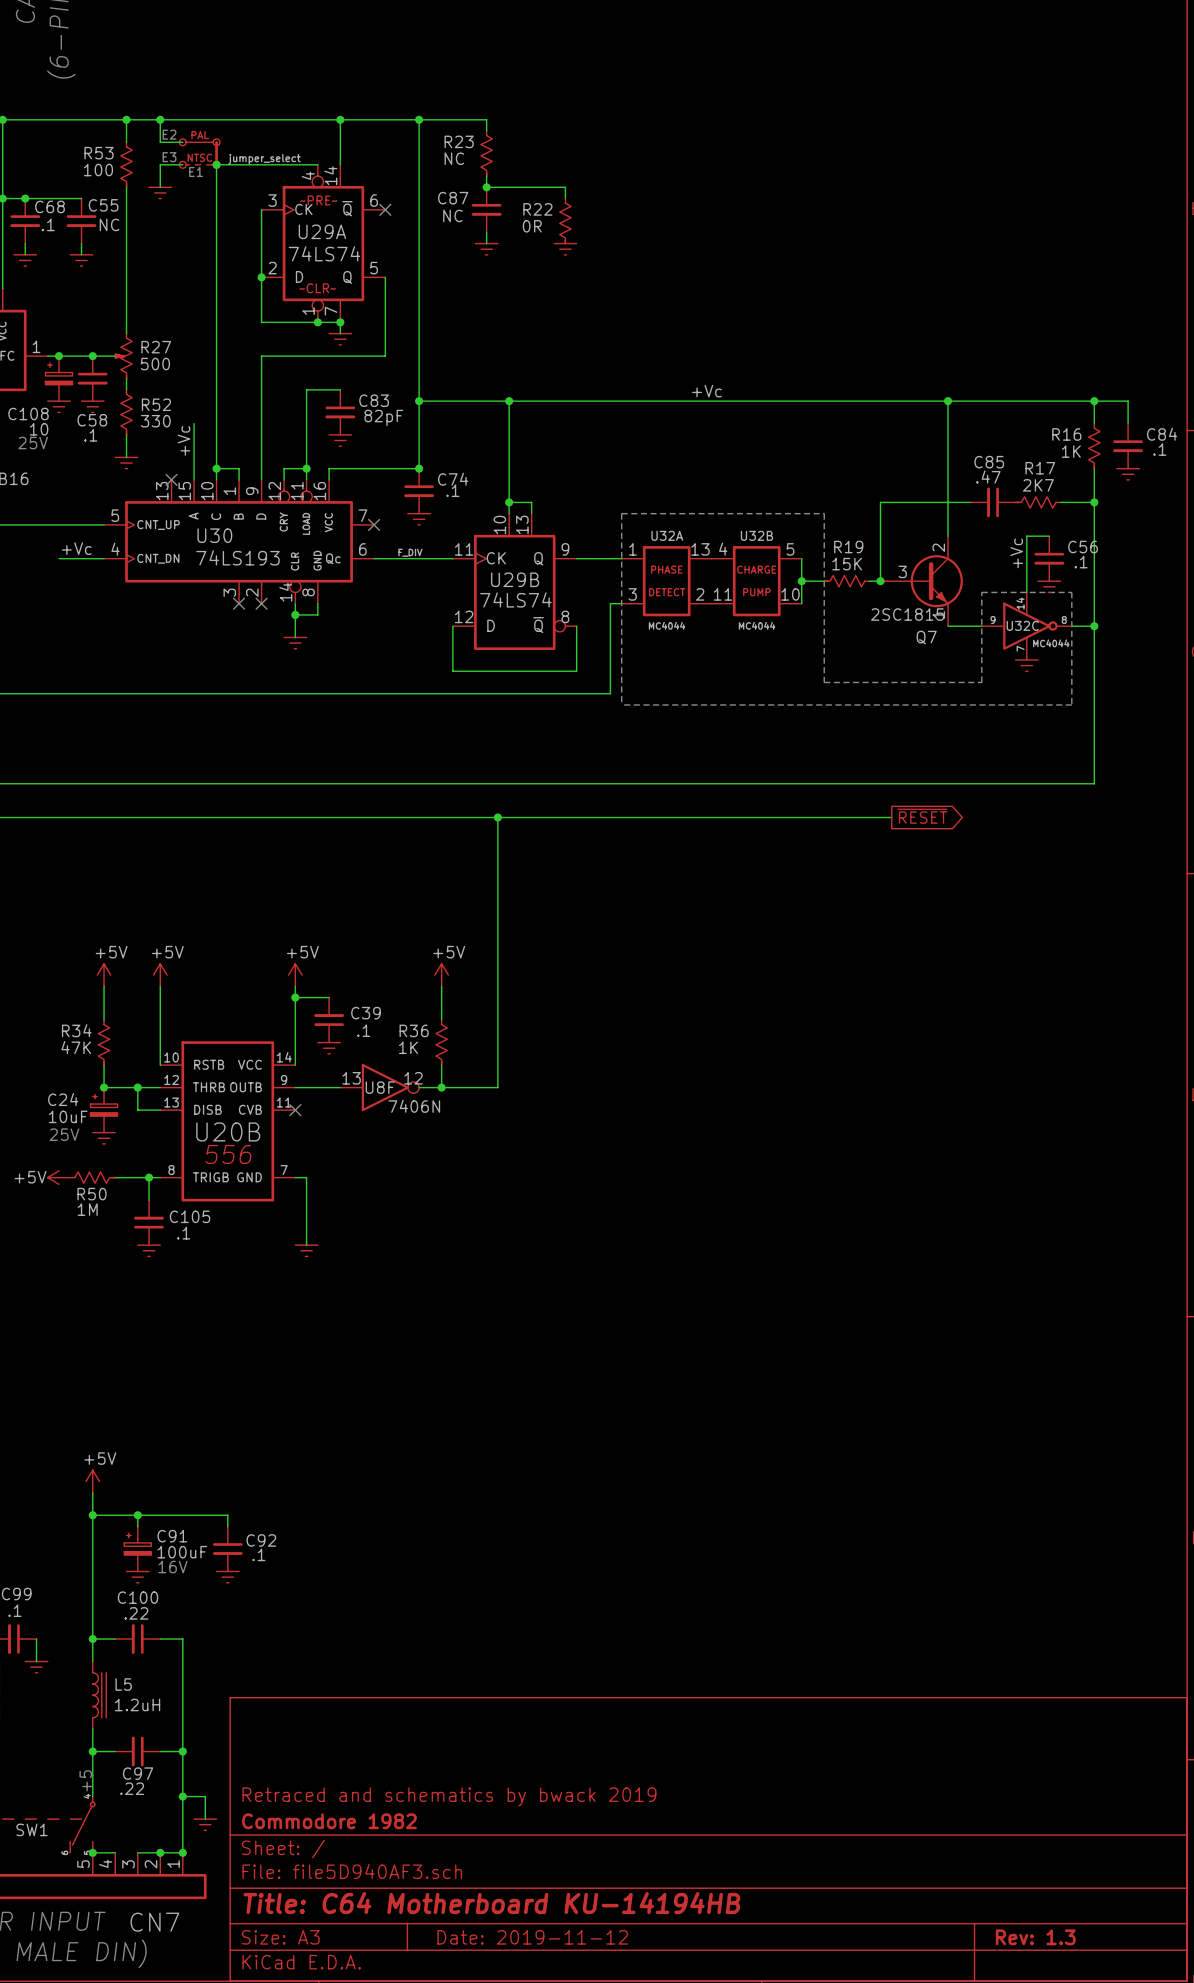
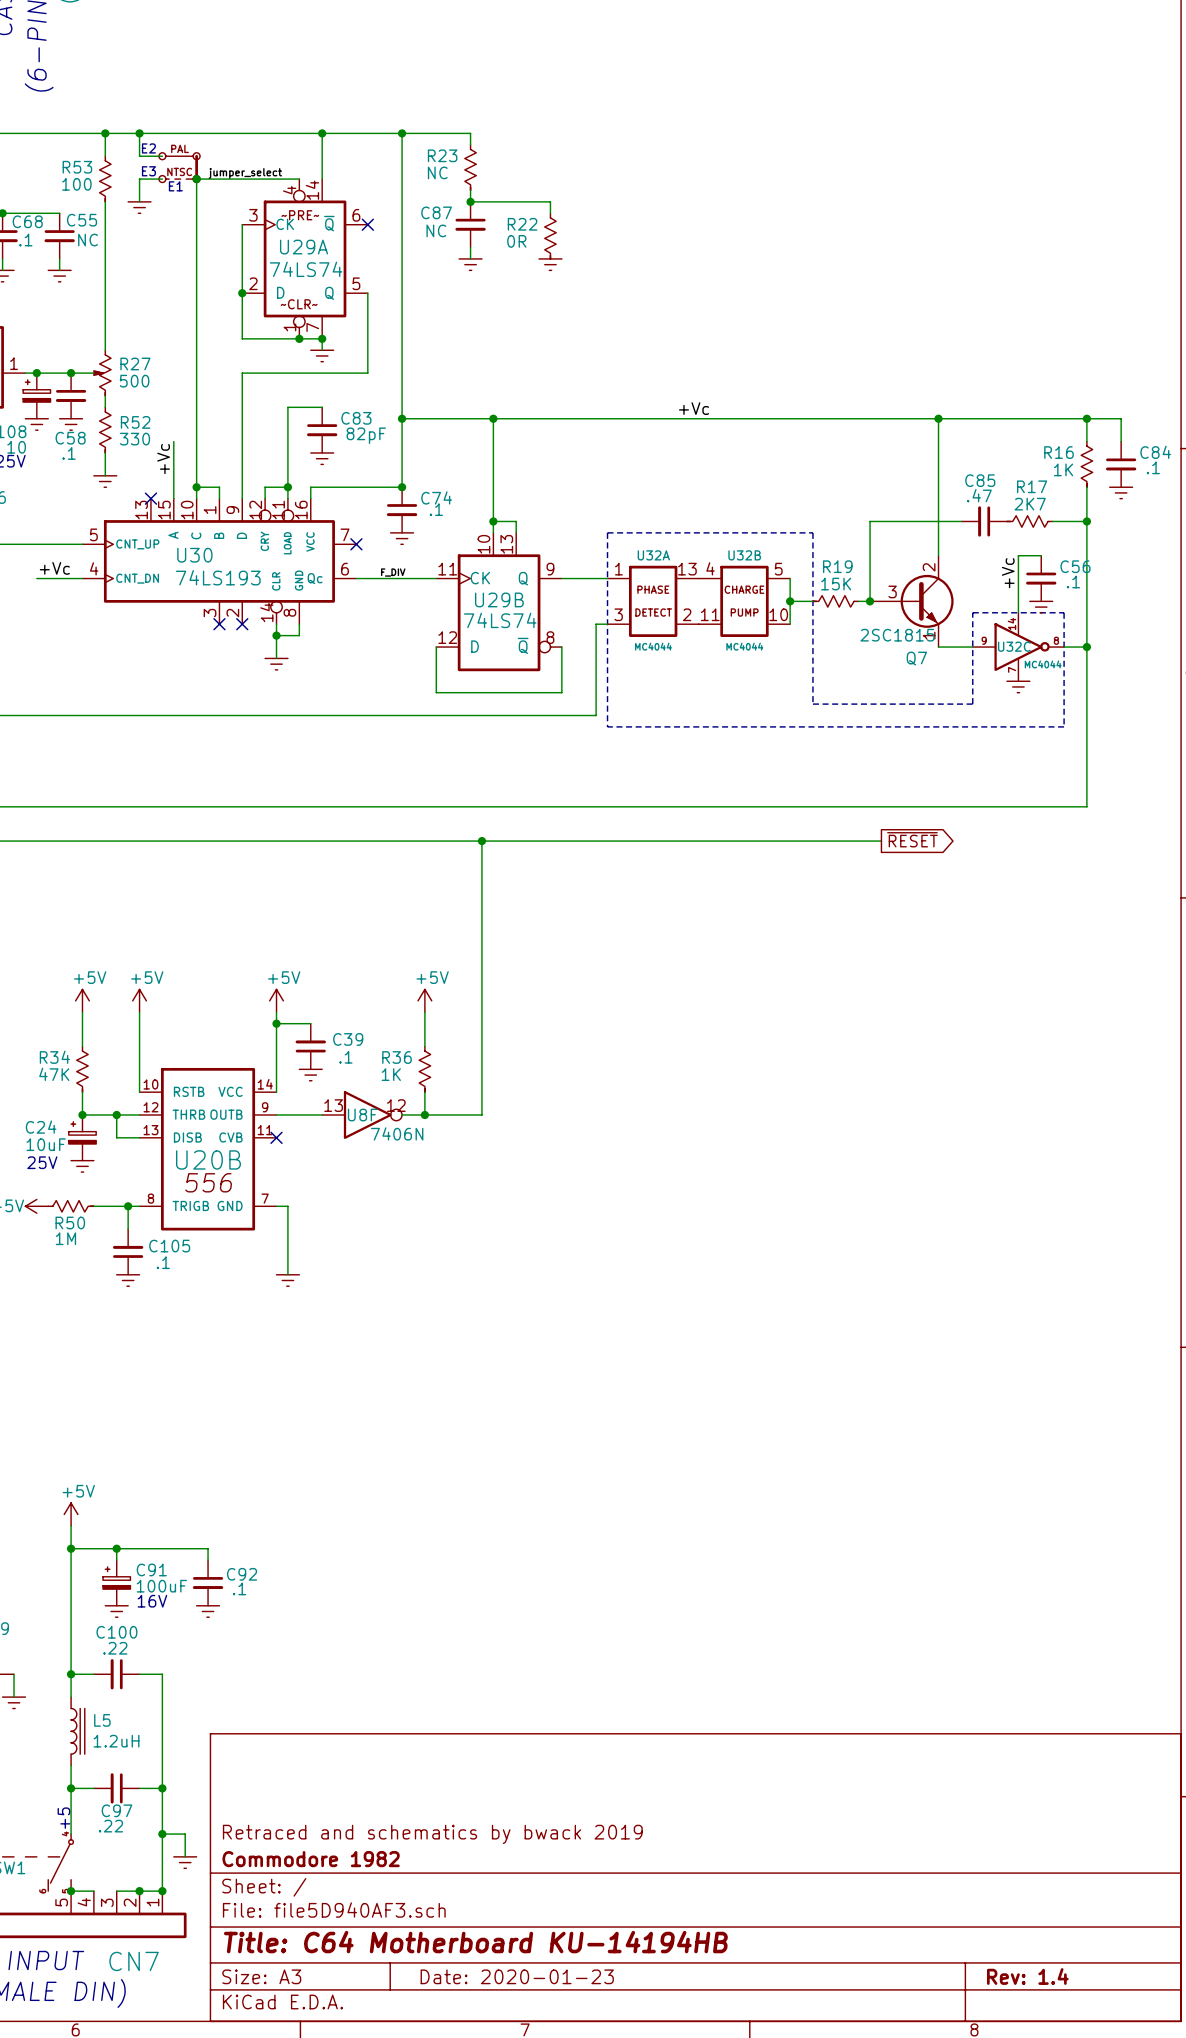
title block: Date: 2019-11-12 (532, 1937) -> Date: 2020-01-23 (517, 1976)
title block: Rev: 1.3 (1035, 1937) -> Rev: 1.4 (1027, 1976)

